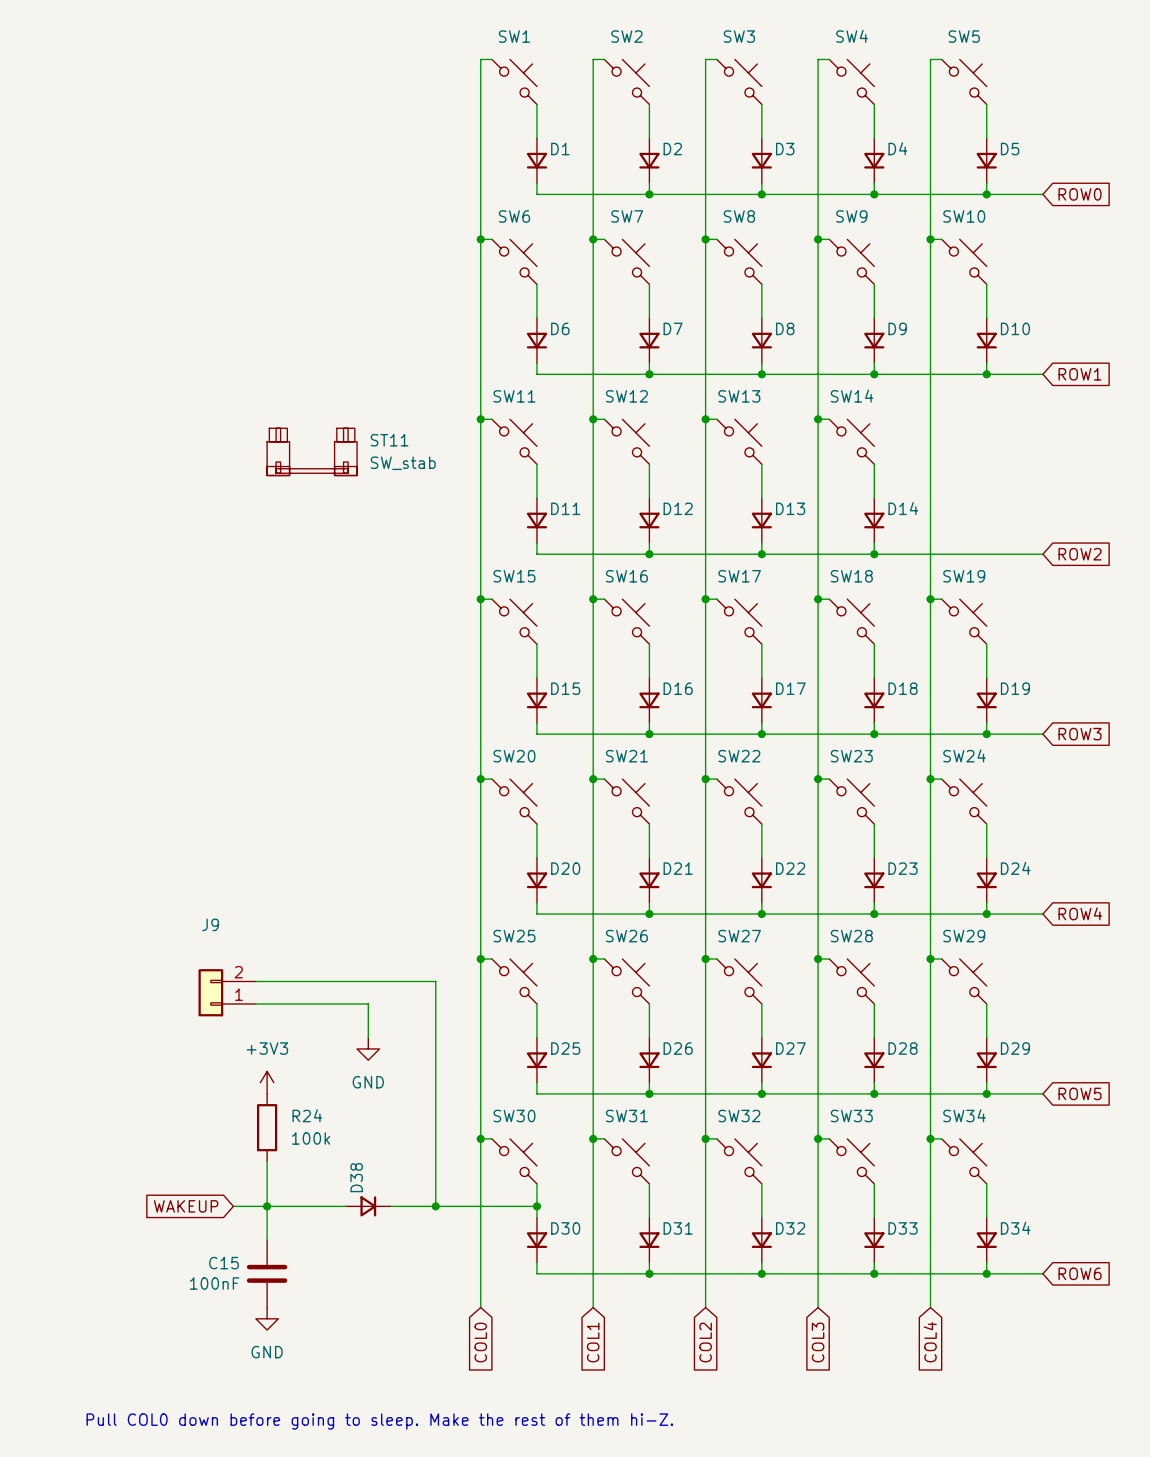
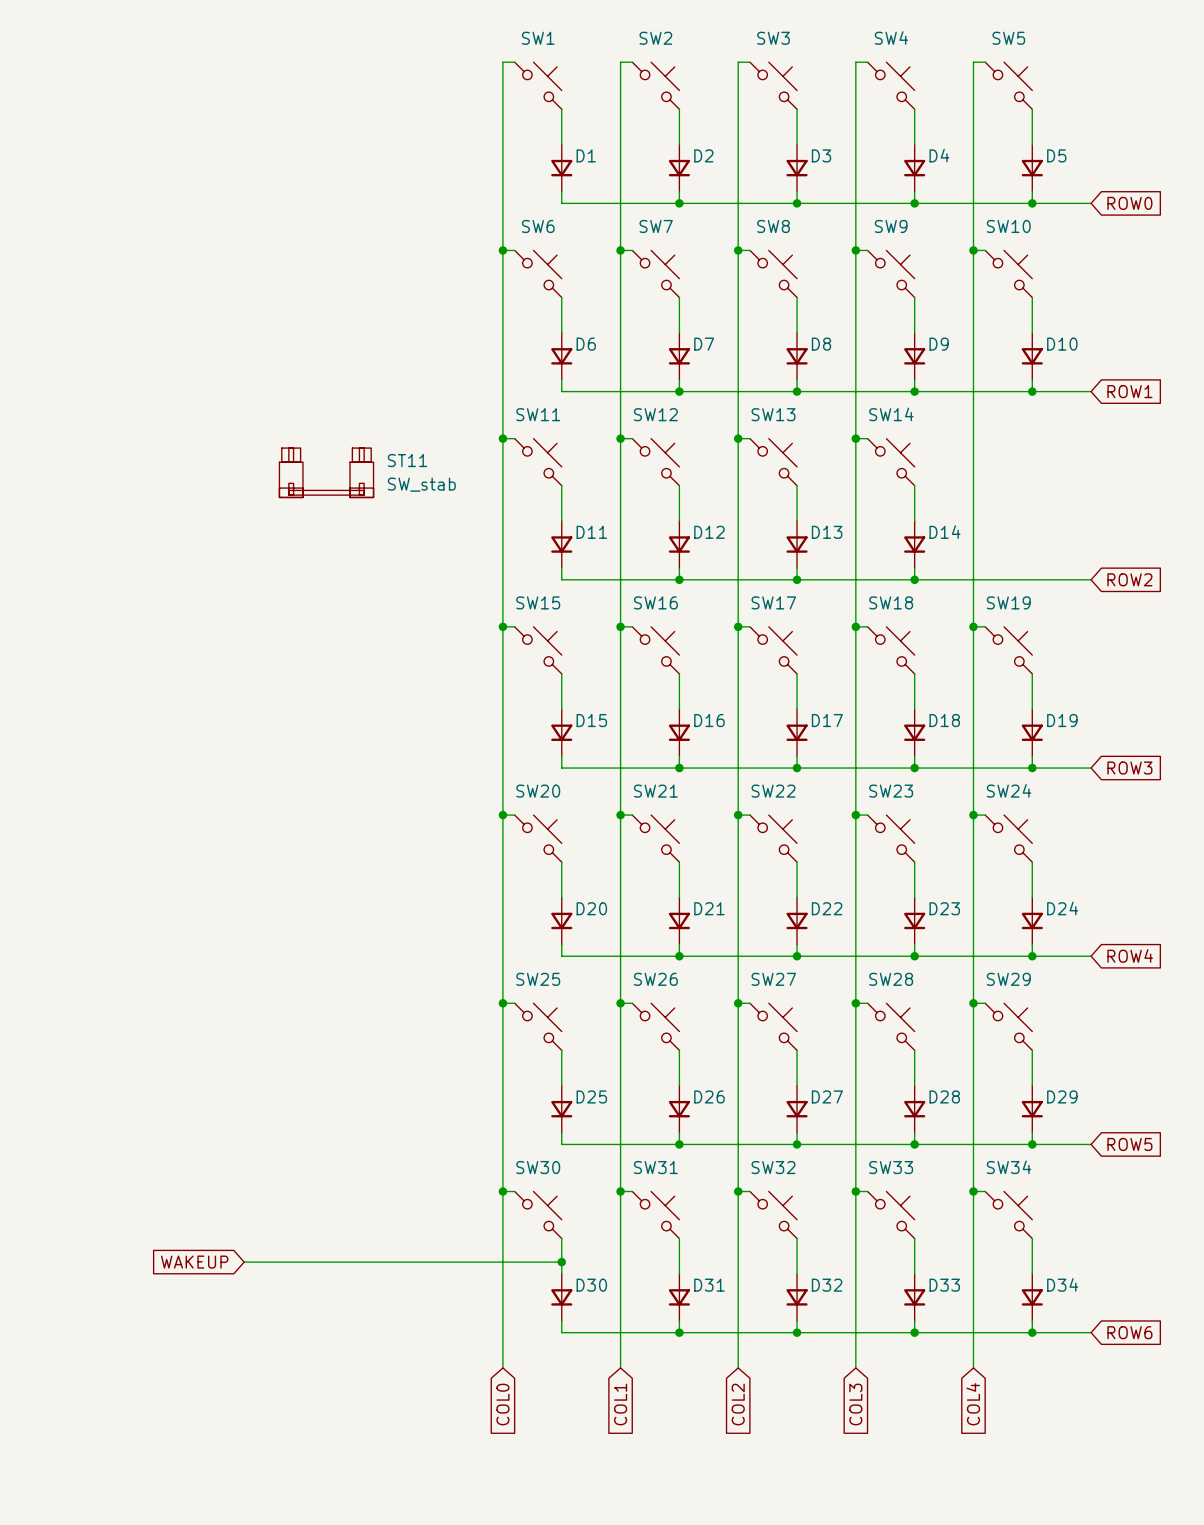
wire: (255, 981) (435, 981) (435, 1206) -> none
J9: (227, 992) -> none
wire: (255, 1003) (368, 1003) (368, 1037) -> none
power symbol: GND (368, 1048) -> none
power symbol: +3V3 (267, 1082) -> none
R24: 100k (267, 1127) -> none
wire: (267, 1161) (267, 1240) -> none
junction: (267, 1206) -> none
D38: (368, 1206) -> none
junction: (435, 1206) -> none
C15: 100nF (267, 1273) -> none
power symbol: GND (267, 1318) -> none
text: Pull COL0 down before going to sleep. Make the rest of them hi-Z. (379, 1421) -> none

